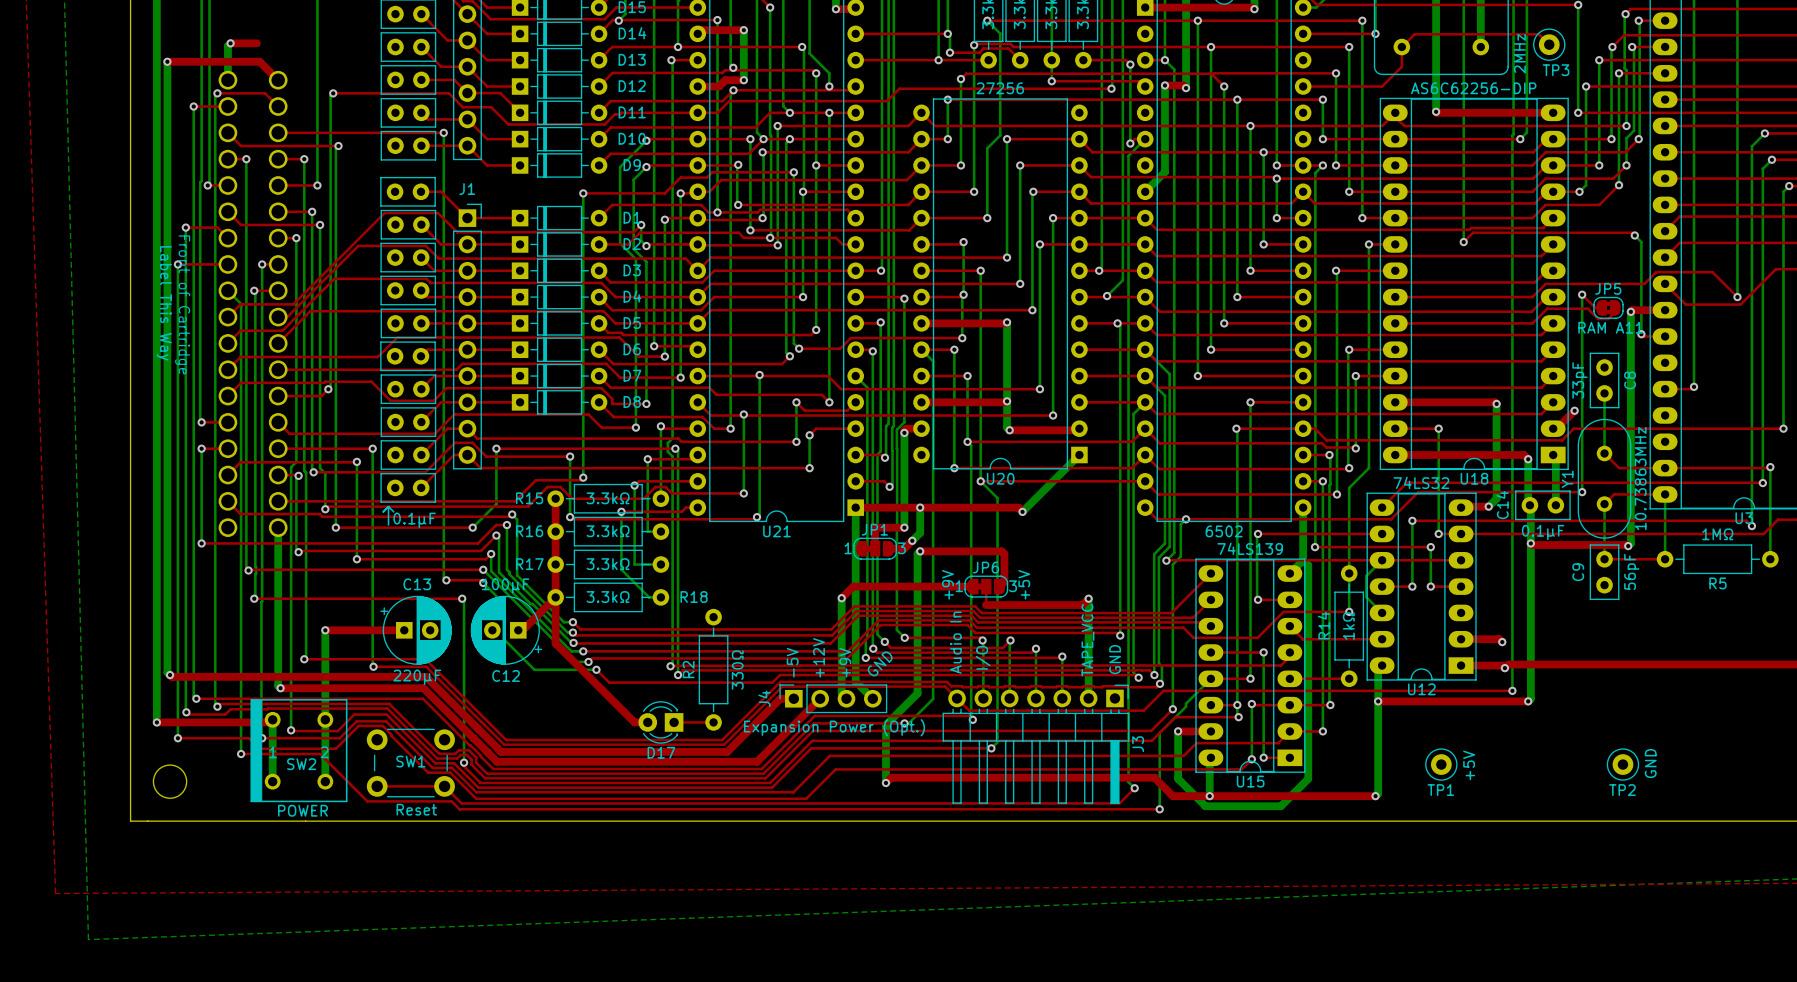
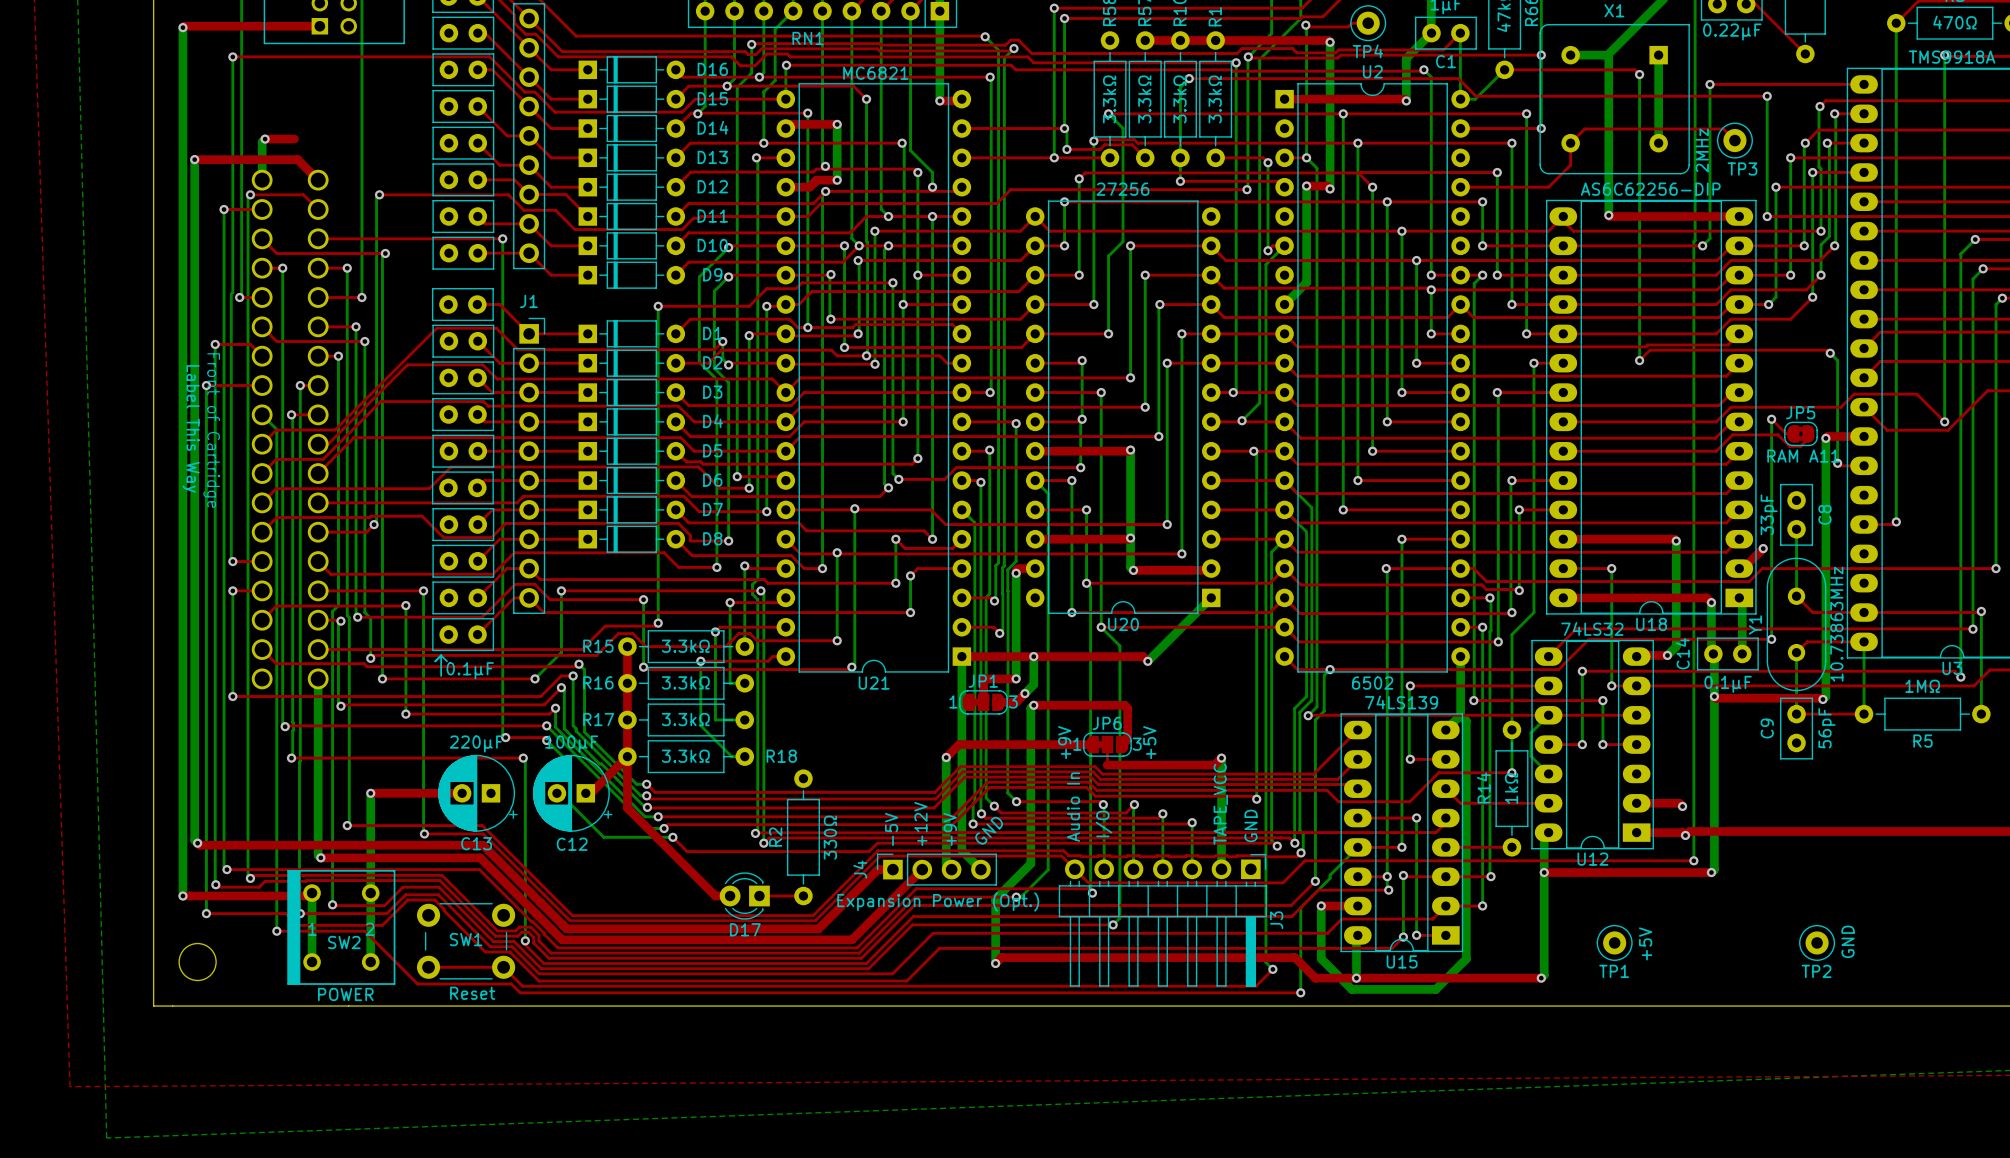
C13 rotation: 0° (416, 630) -> 180° (477, 793)

